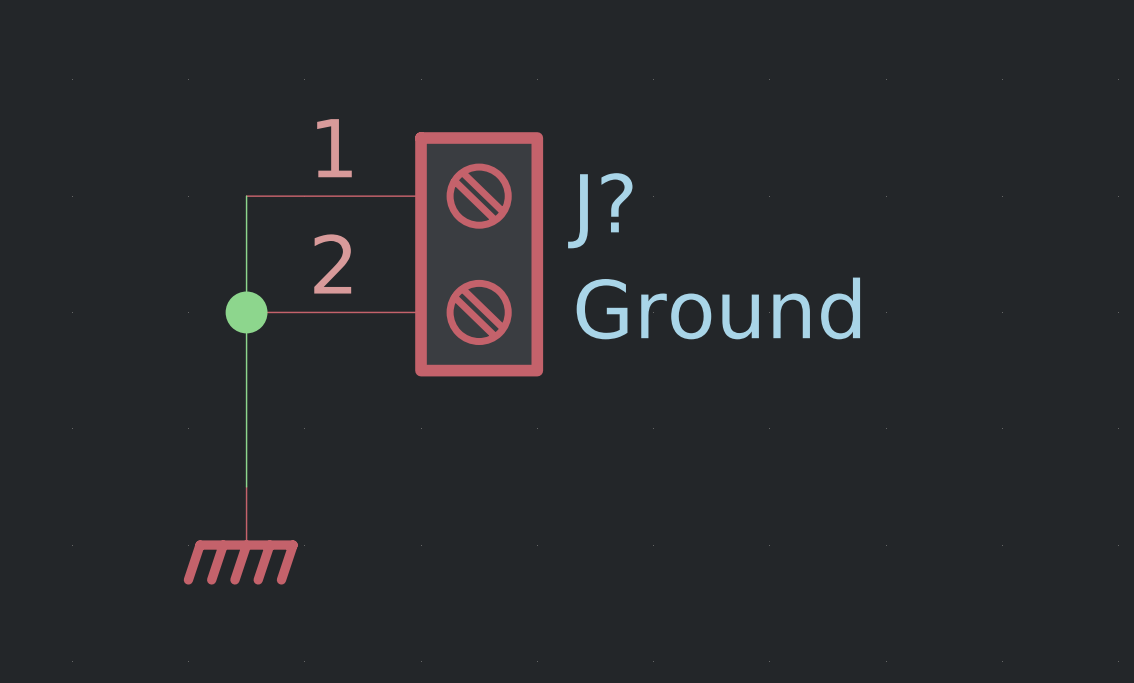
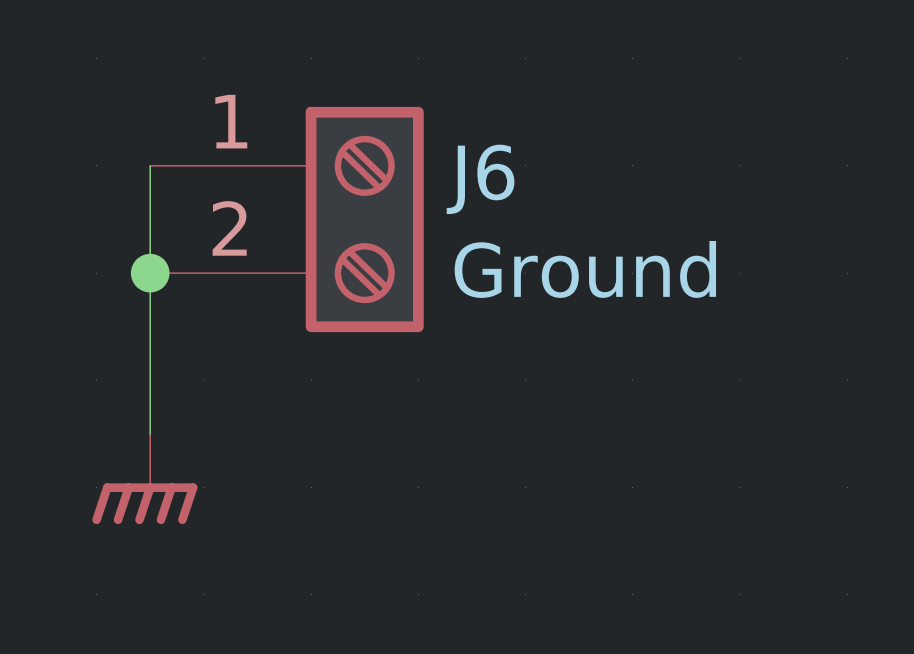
J? name: J? (600, 210) -> J6 (480, 179)

